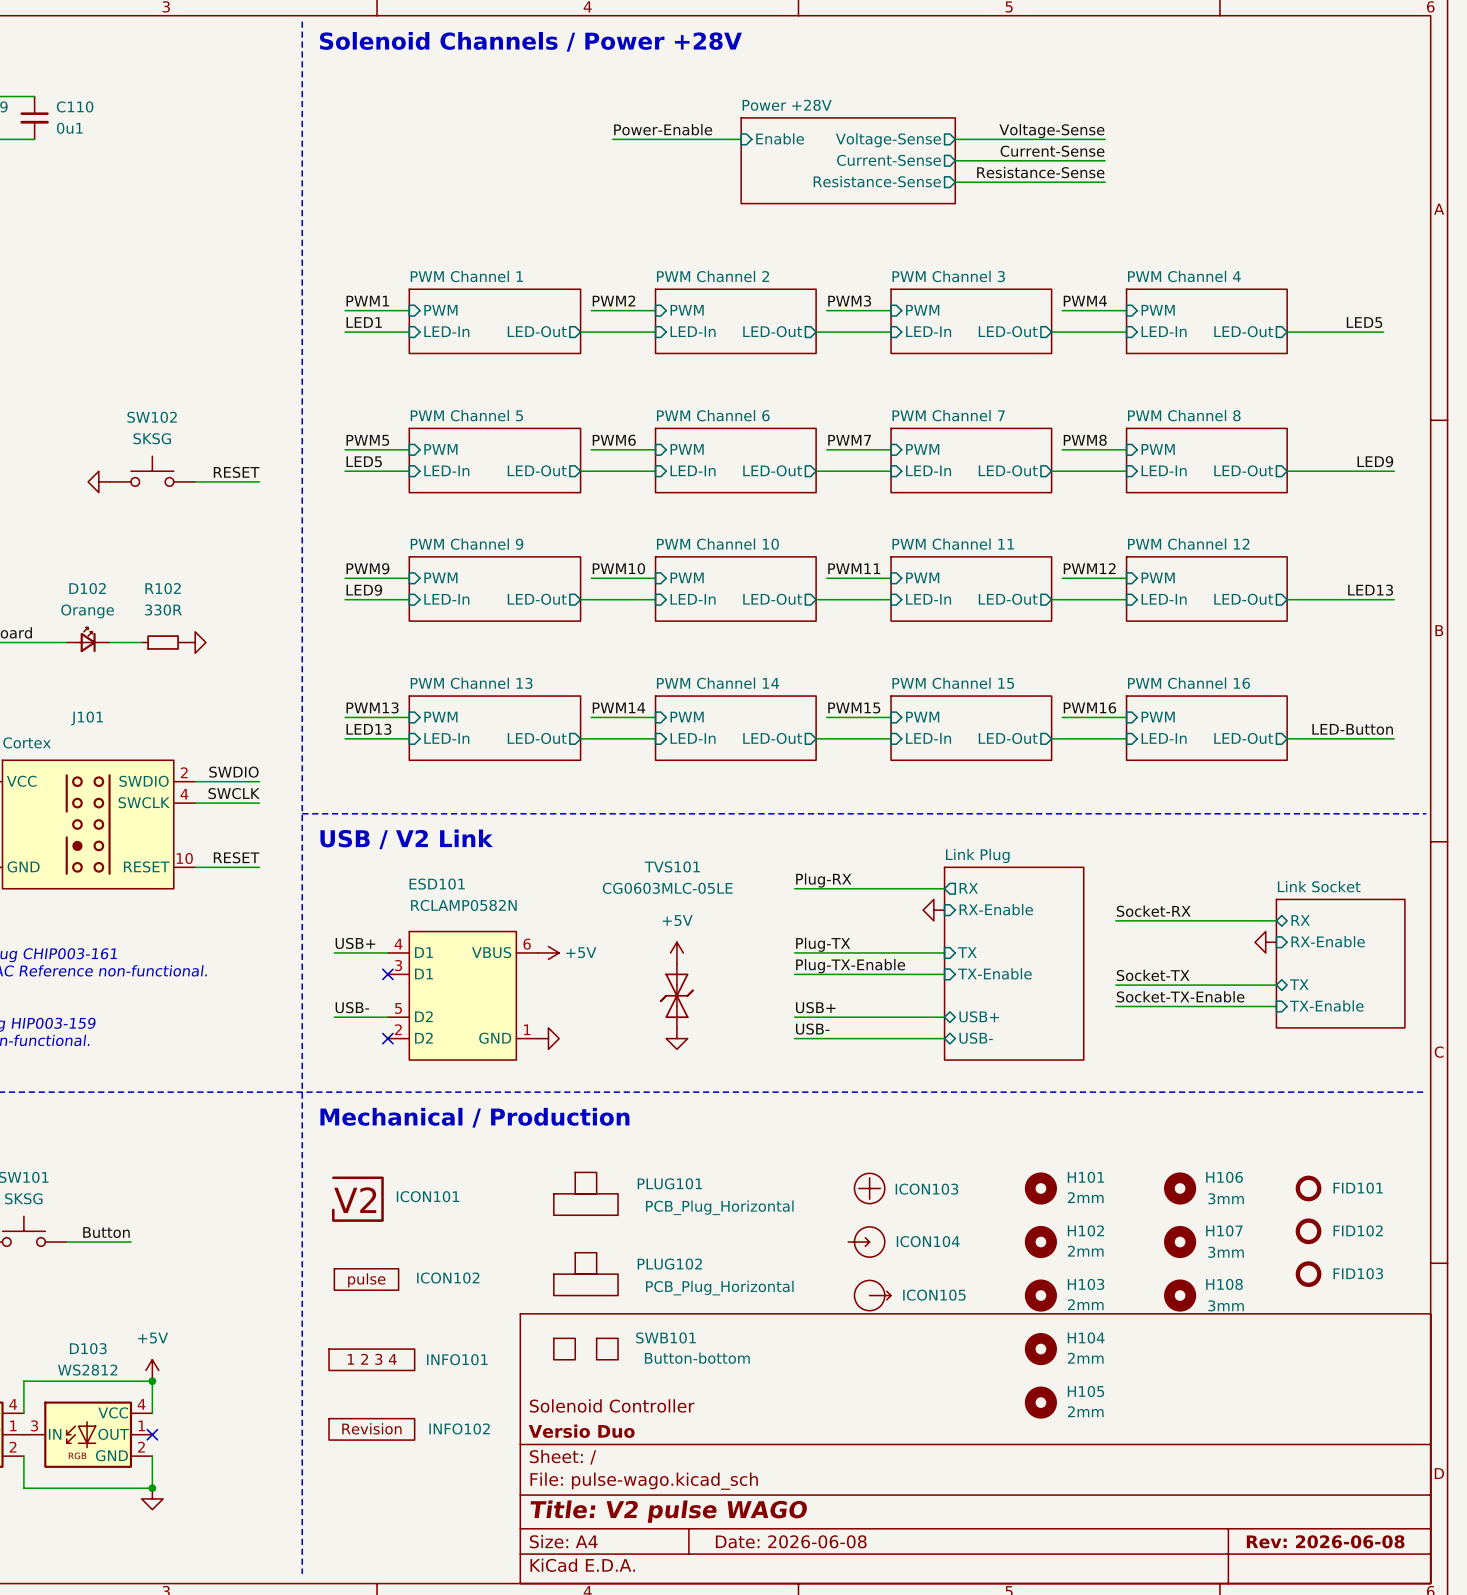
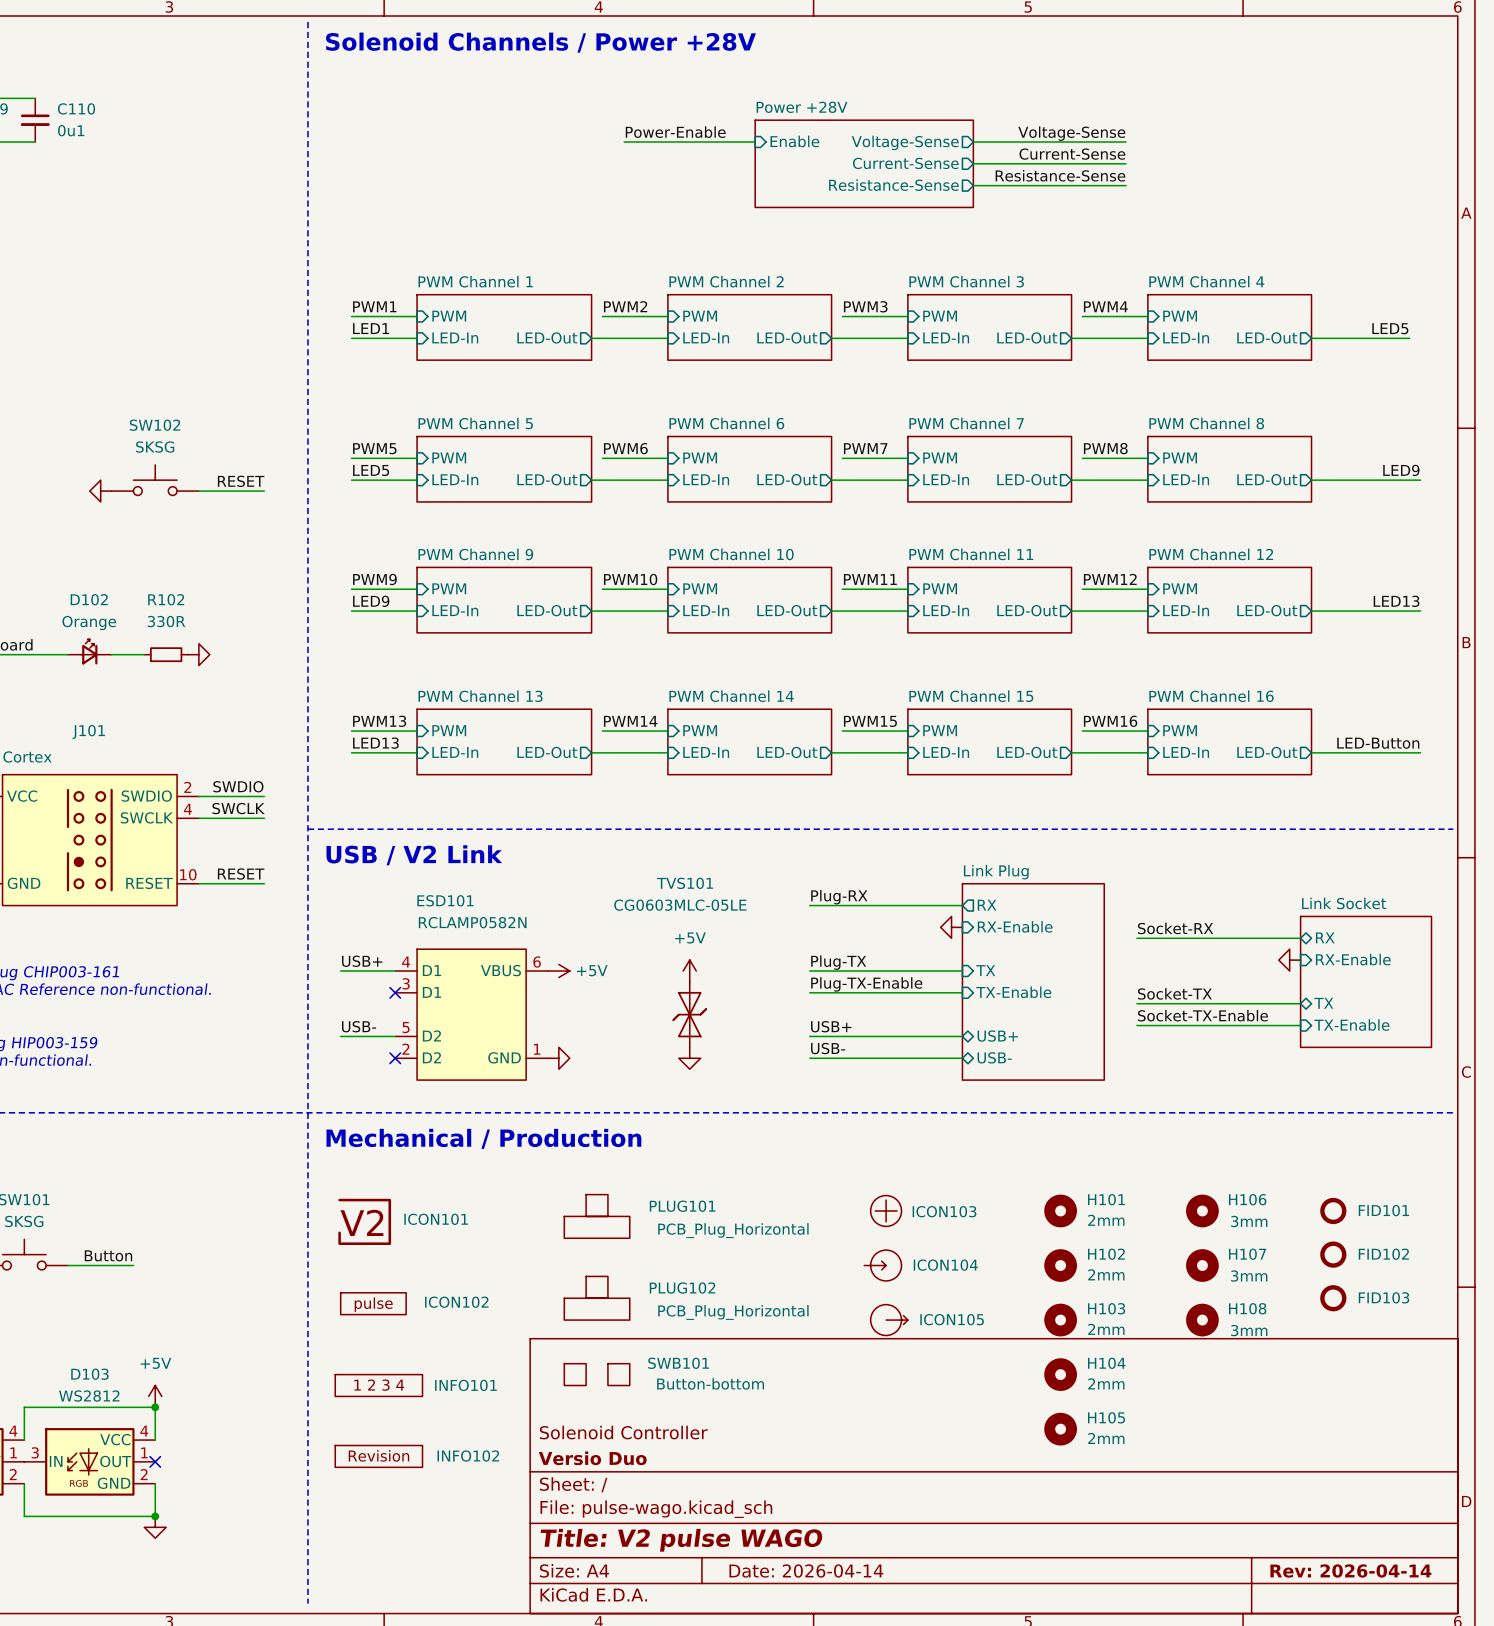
title block: Date: 2026-06-08 (791, 1541) -> Date: 2026-04-14 (806, 1570)
title block: Rev: 2026-06-08 (1325, 1541) -> Rev: 2026-04-14 (1350, 1570)

